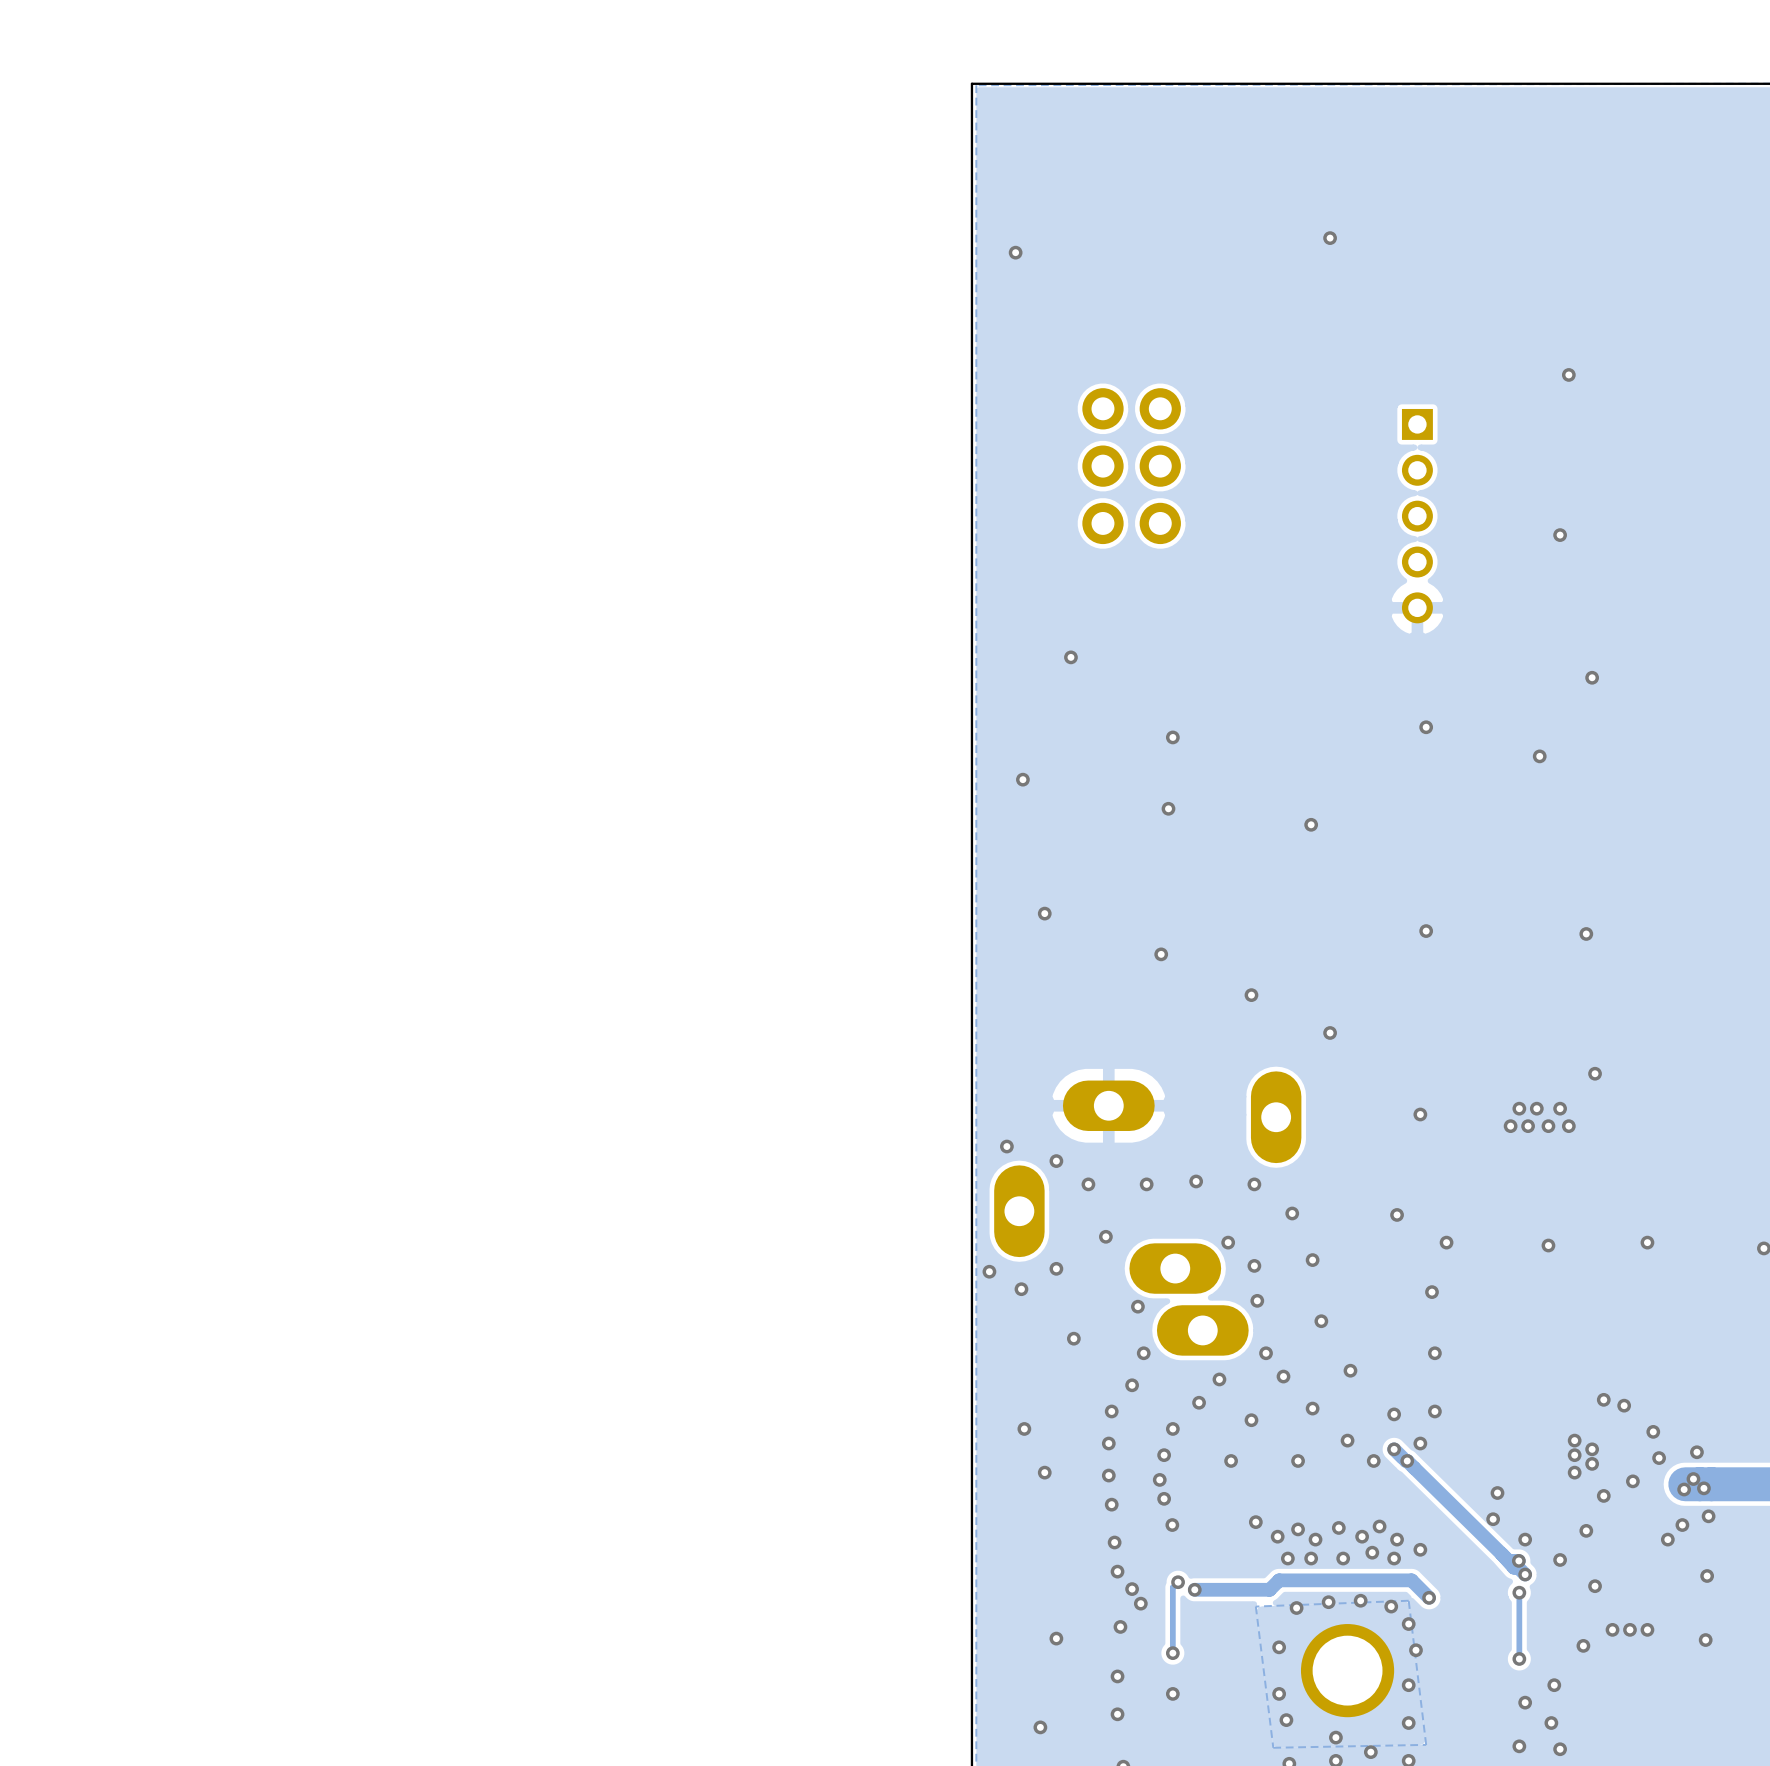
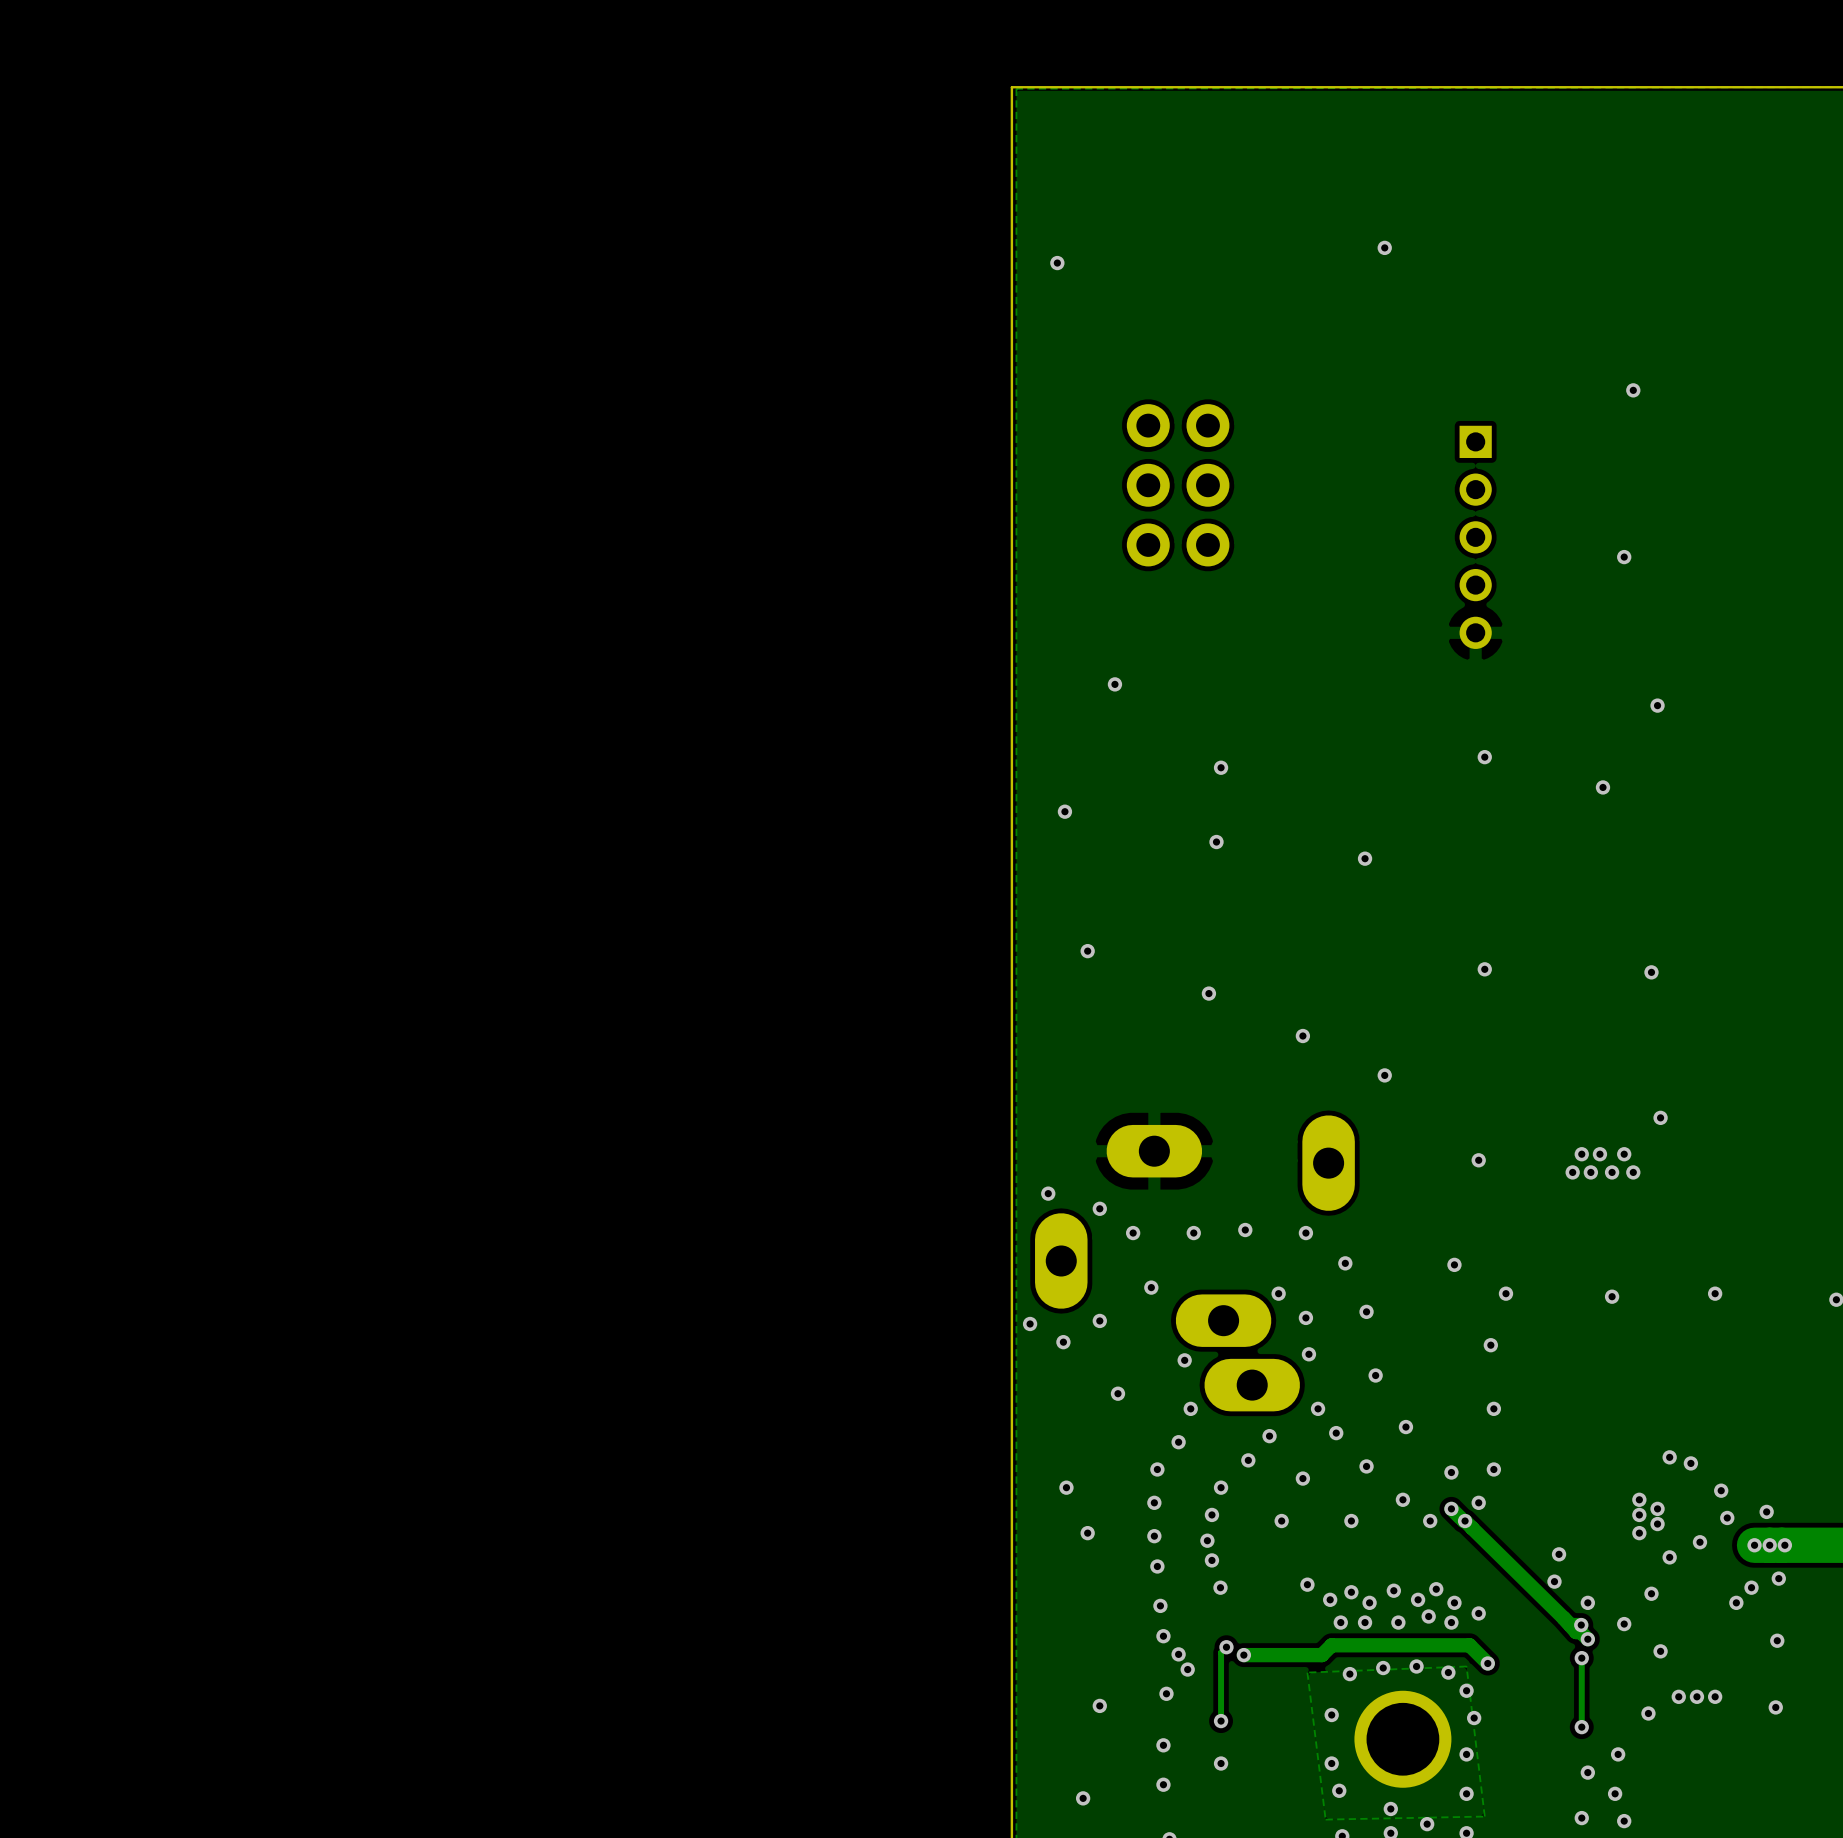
via: (1693, 1479) -> none
via: none -> (1754, 1545)
via: none -> (1769, 1545)
via: none -> (1784, 1545)
via: (1703, 1488) -> none
via: (1684, 1489) -> none

